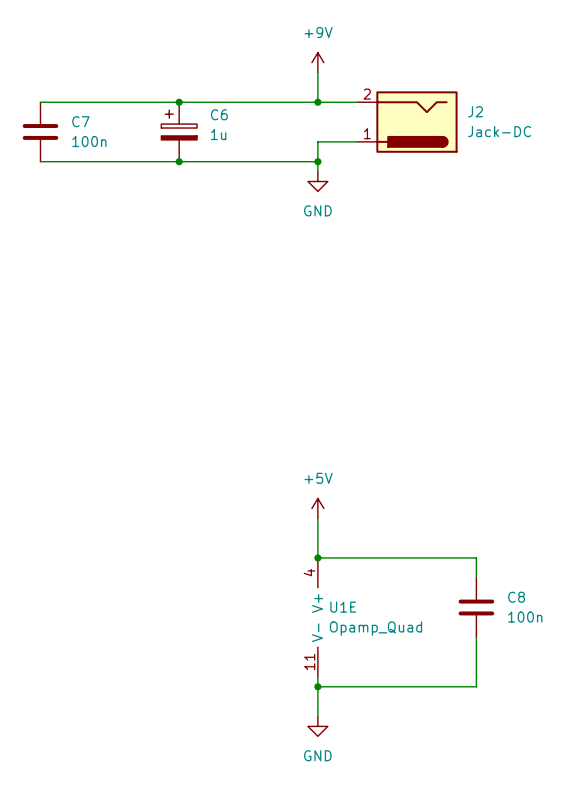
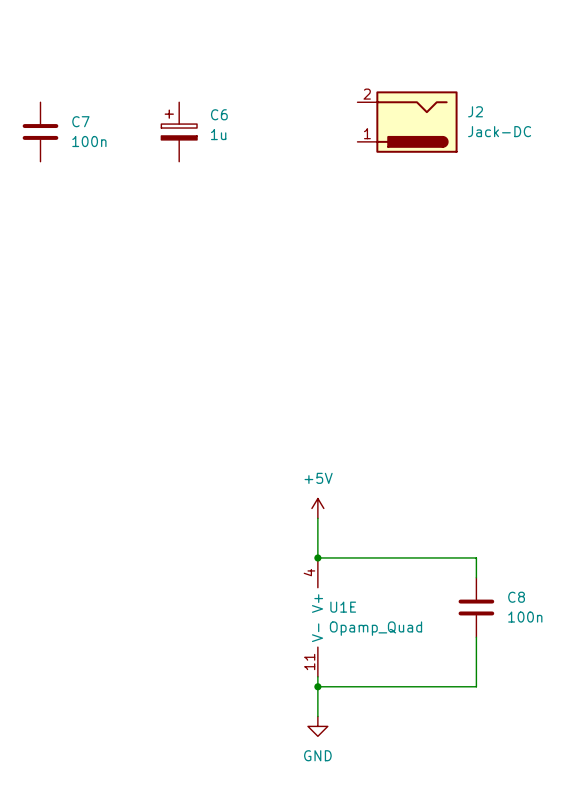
power symbol: +9V (317, 62) -> none
wire: (317, 72) (317, 102) -> none
wire: (40, 102) (357, 102) -> none
junction: (179, 102) -> none
junction: (317, 102) -> none
wire: (357, 141) (317, 141) (317, 171) -> none
wire: (40, 161) (317, 161) -> none
junction: (179, 161) -> none
junction: (317, 161) -> none
power symbol: GND (317, 181) -> none

